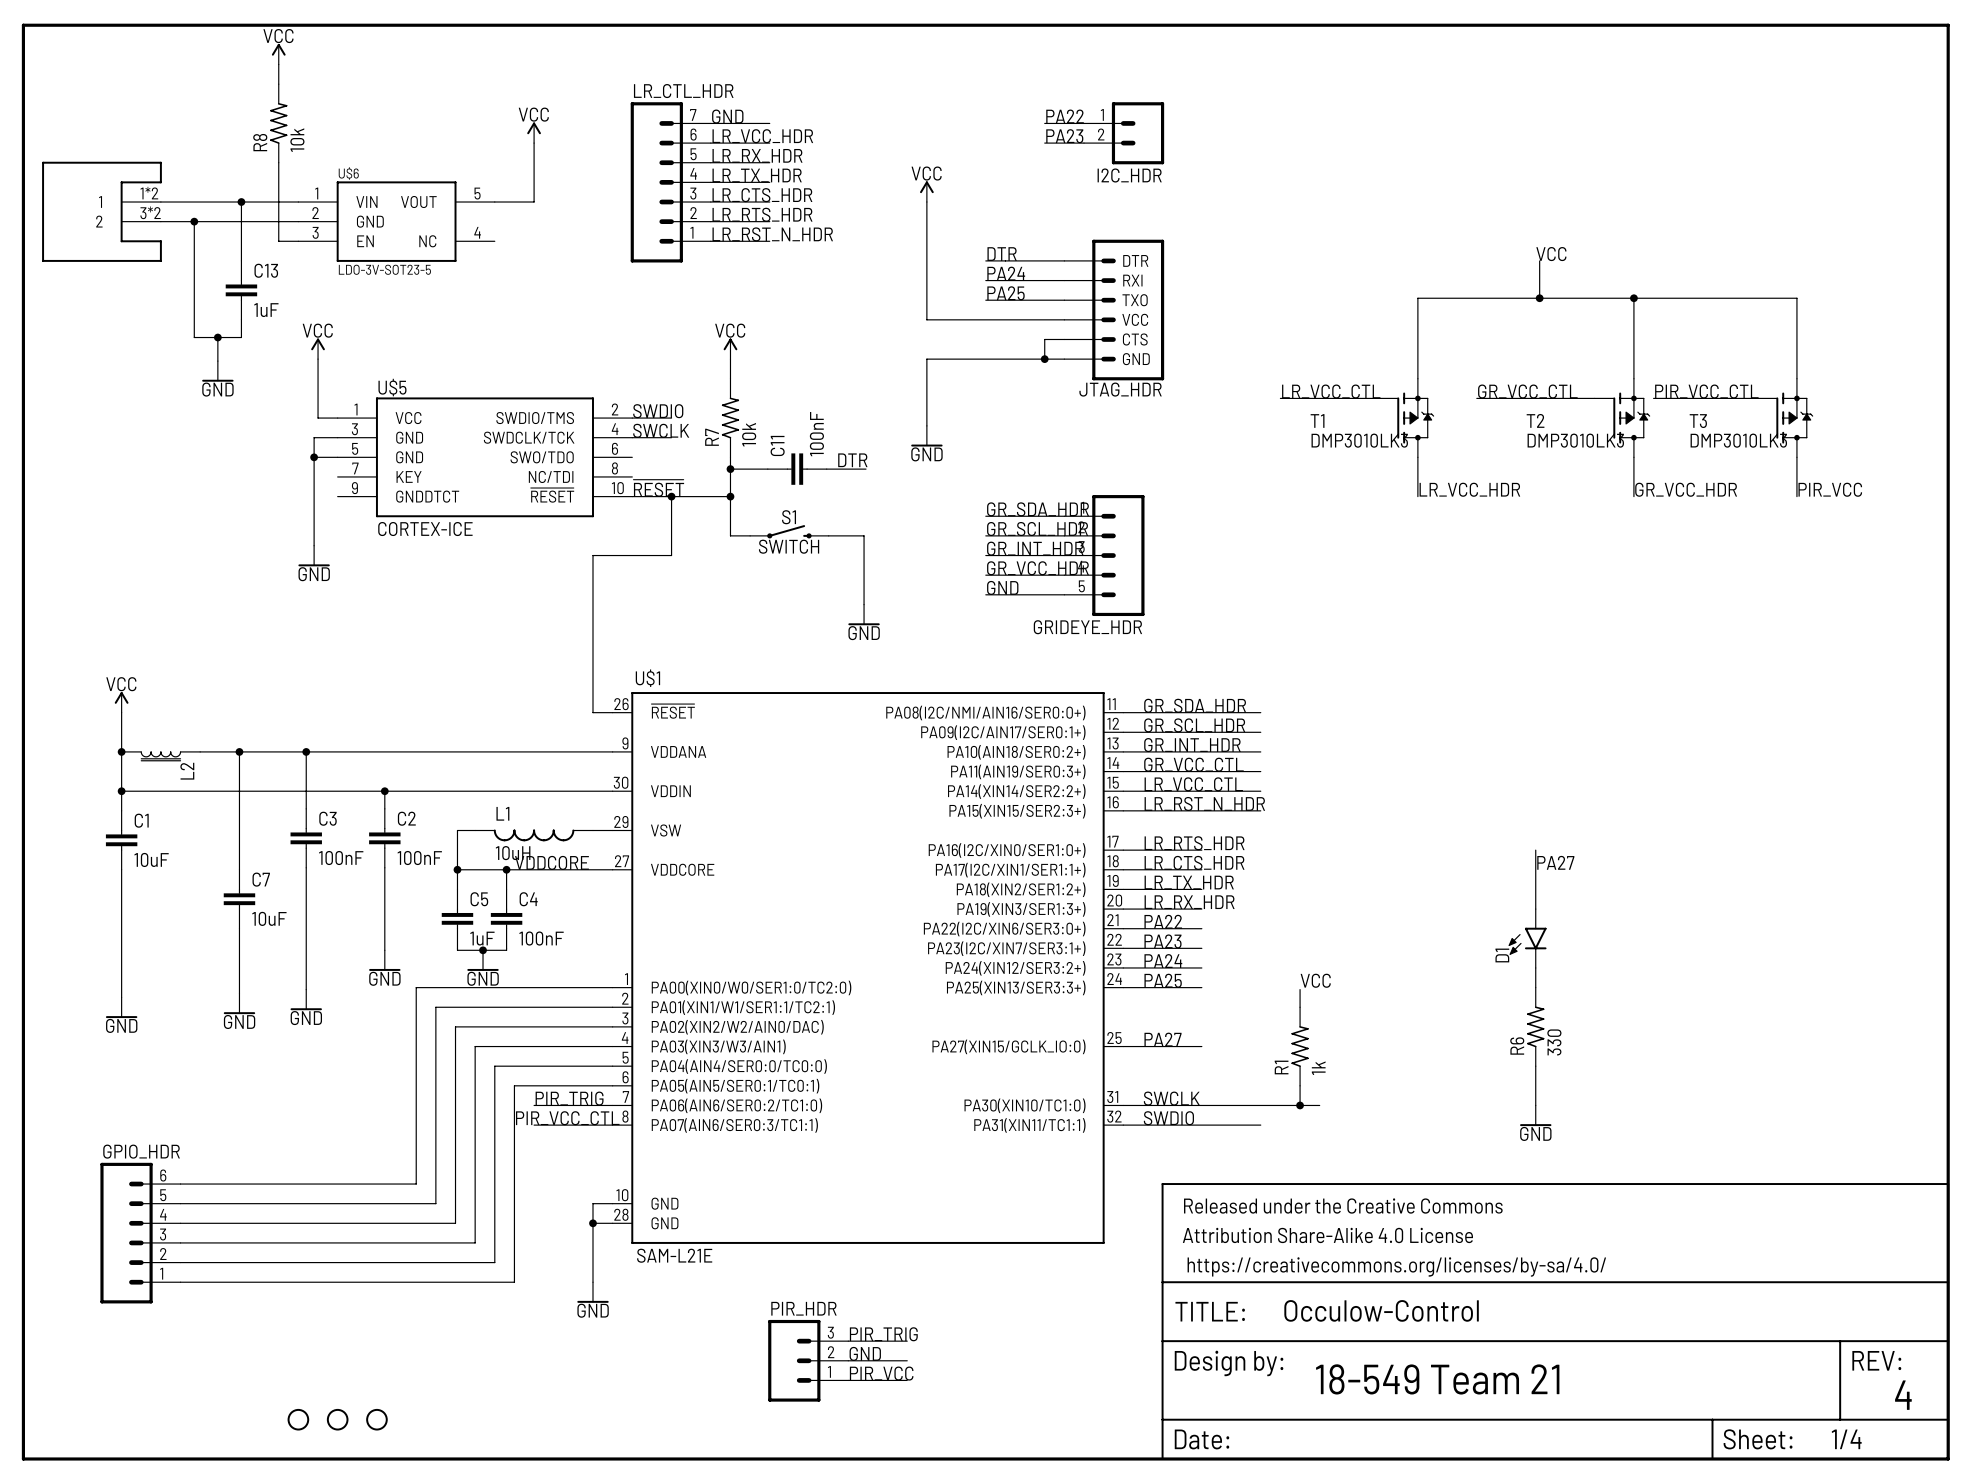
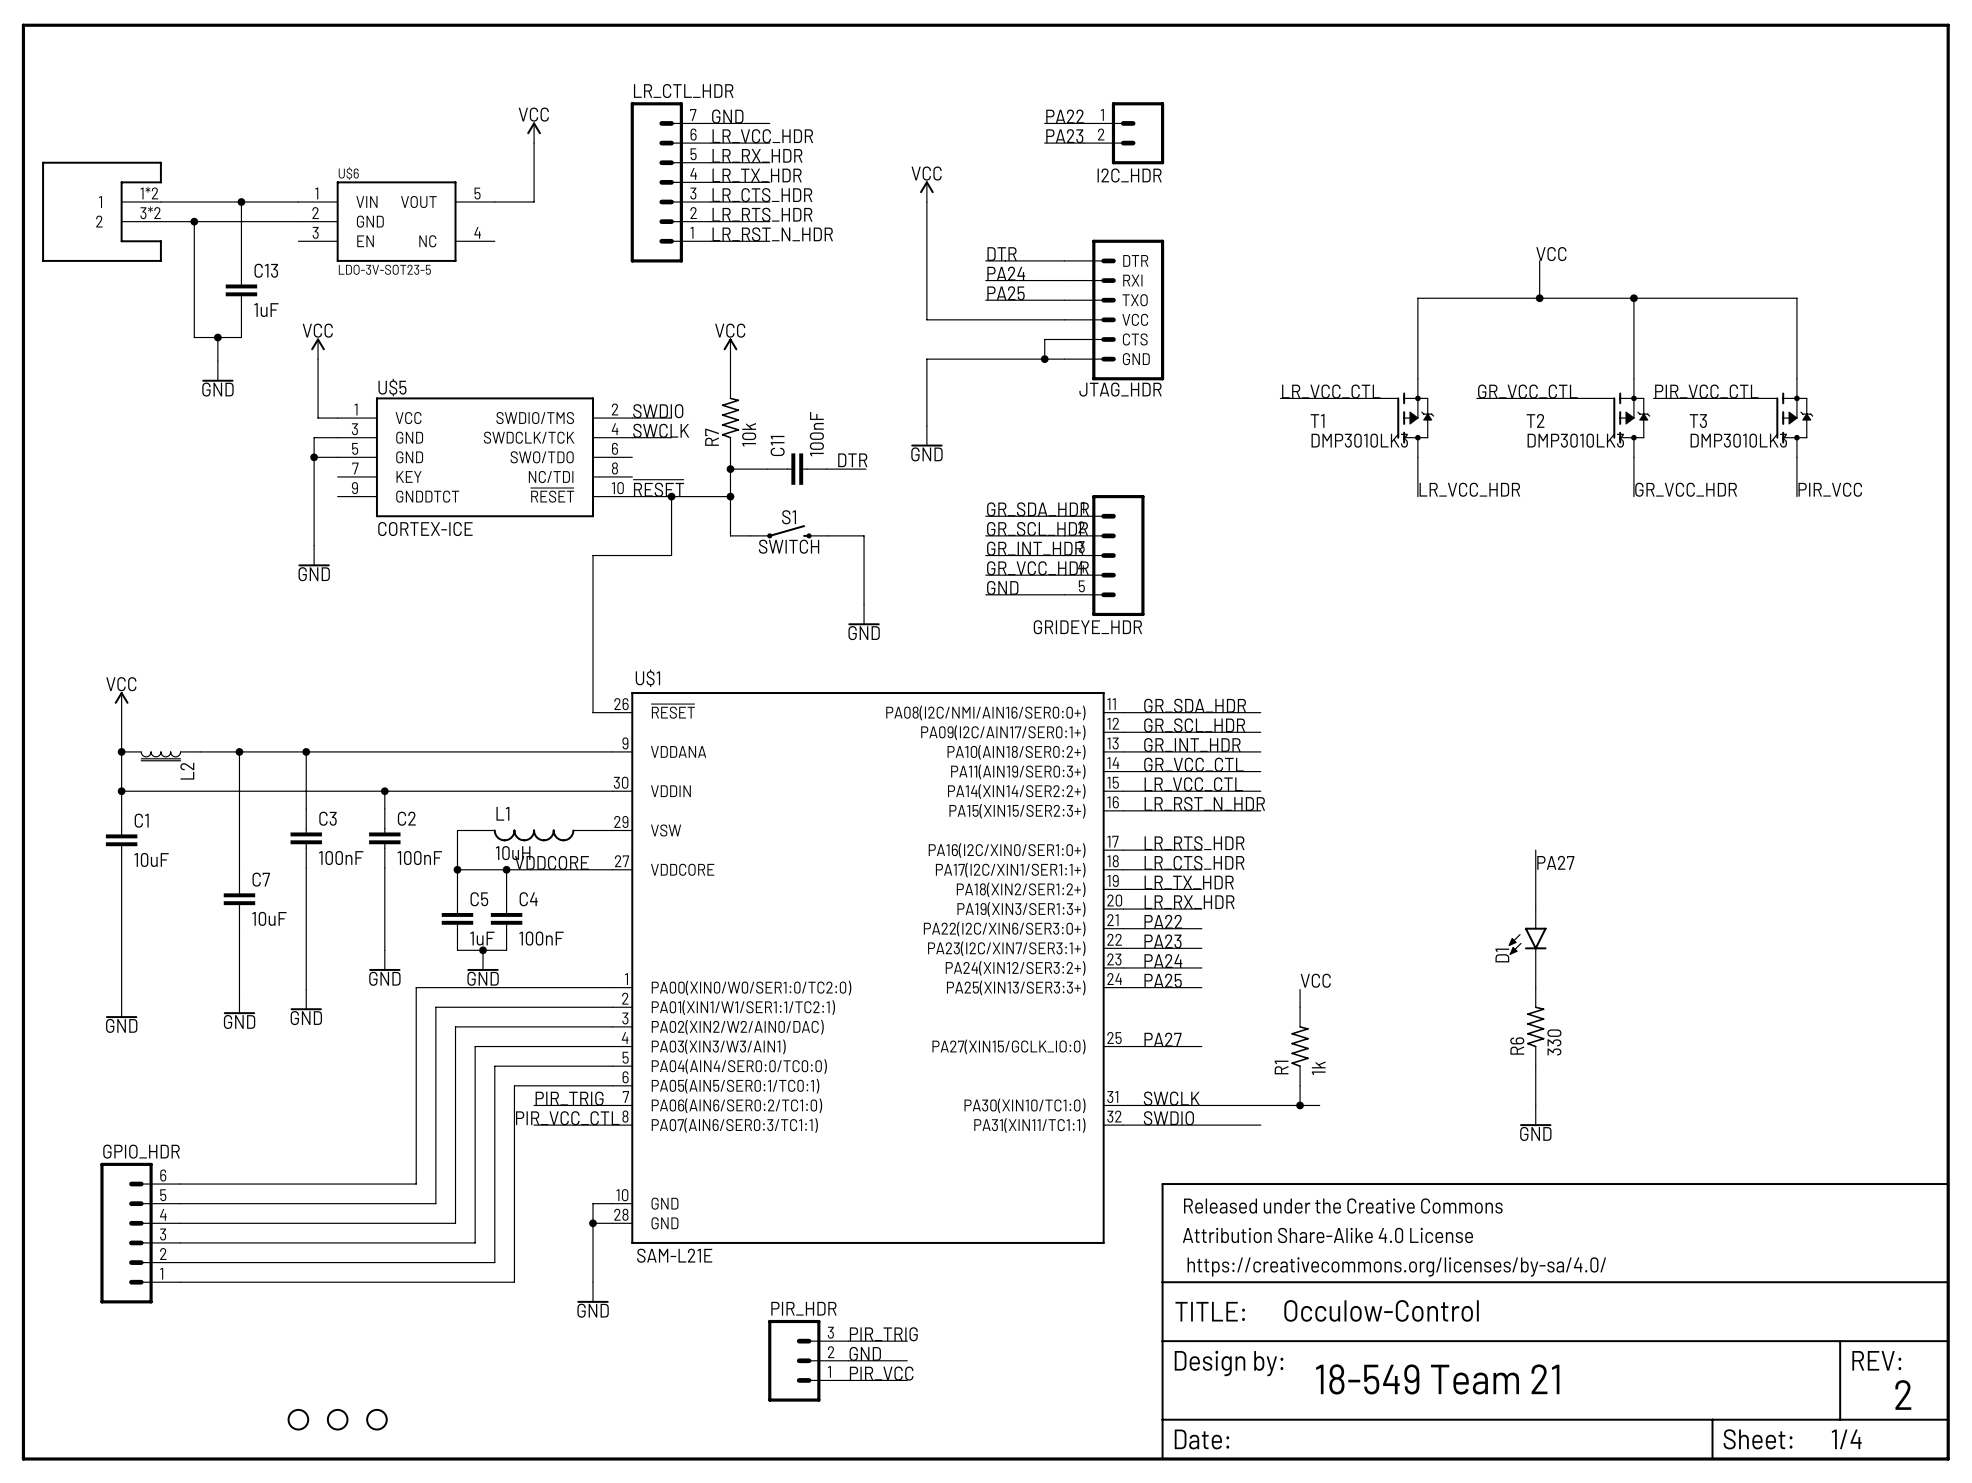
power symbol: VCC (278, 54) -> none
wire: (278, 64) (278, 84) -> none
R8: 10k (278, 123) -> none
wire: (278, 162) (278, 241) (298, 241) -> none
text: 4 (1903, 1395) -> 2 (1903, 1394)

